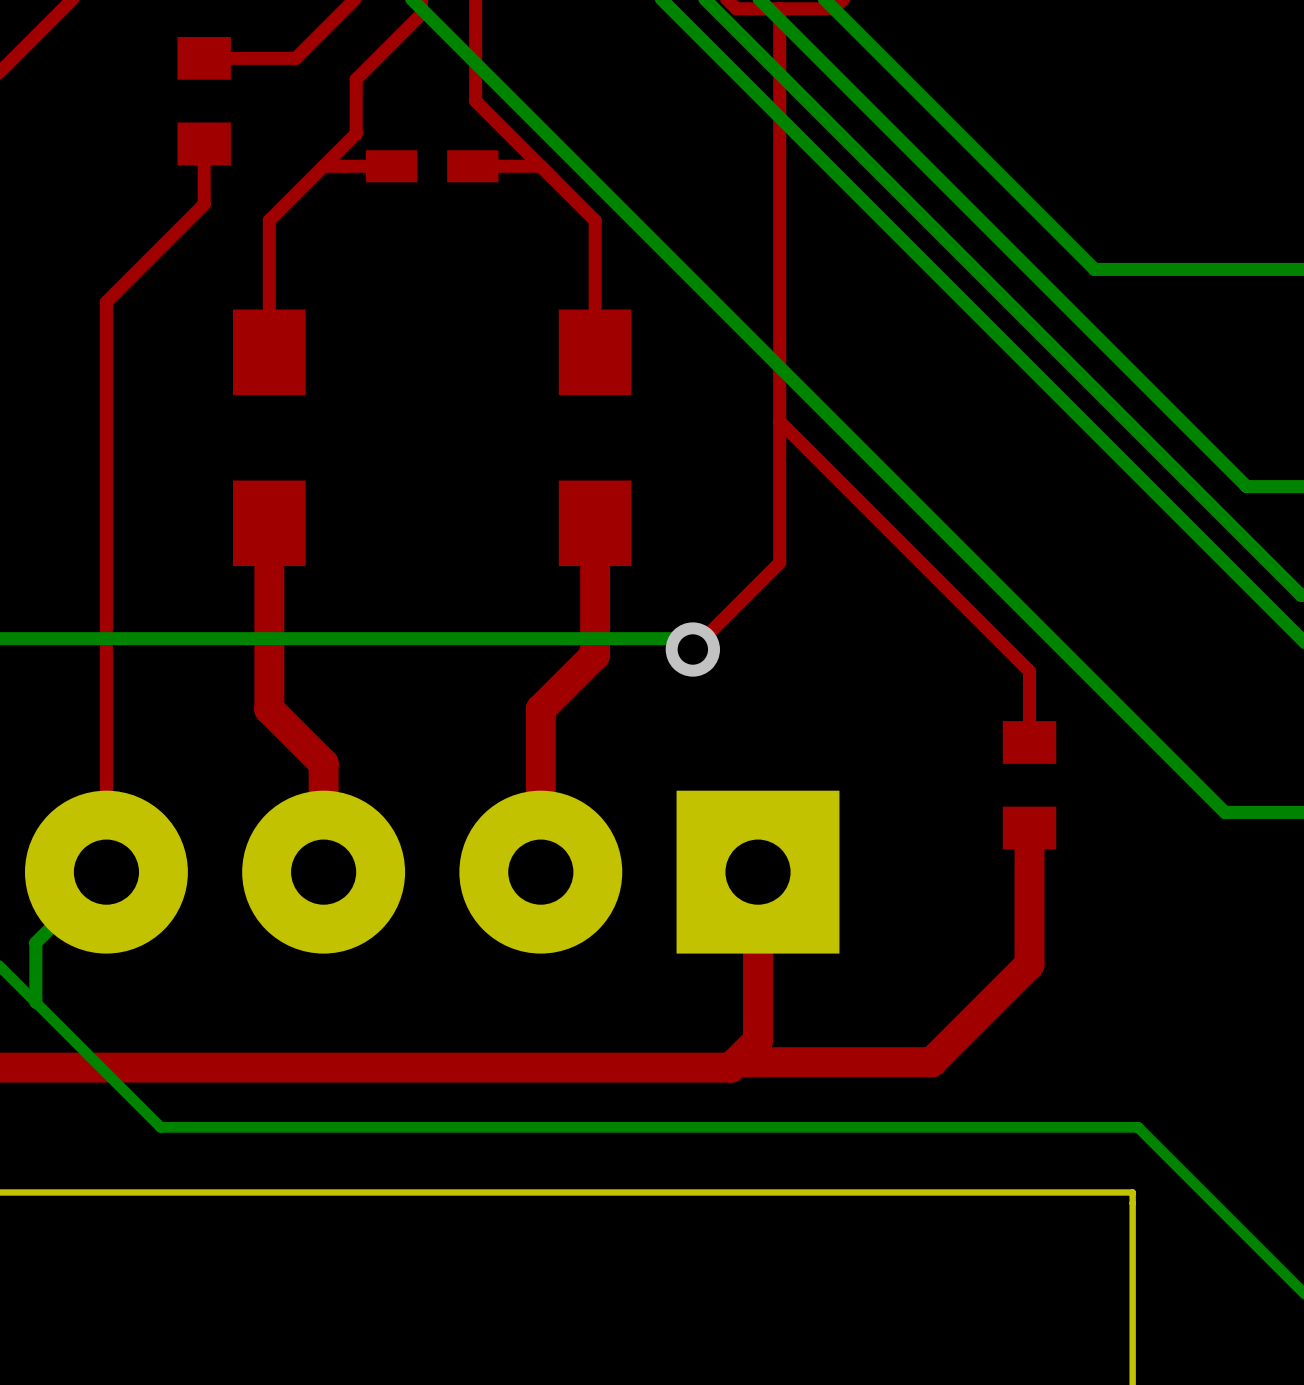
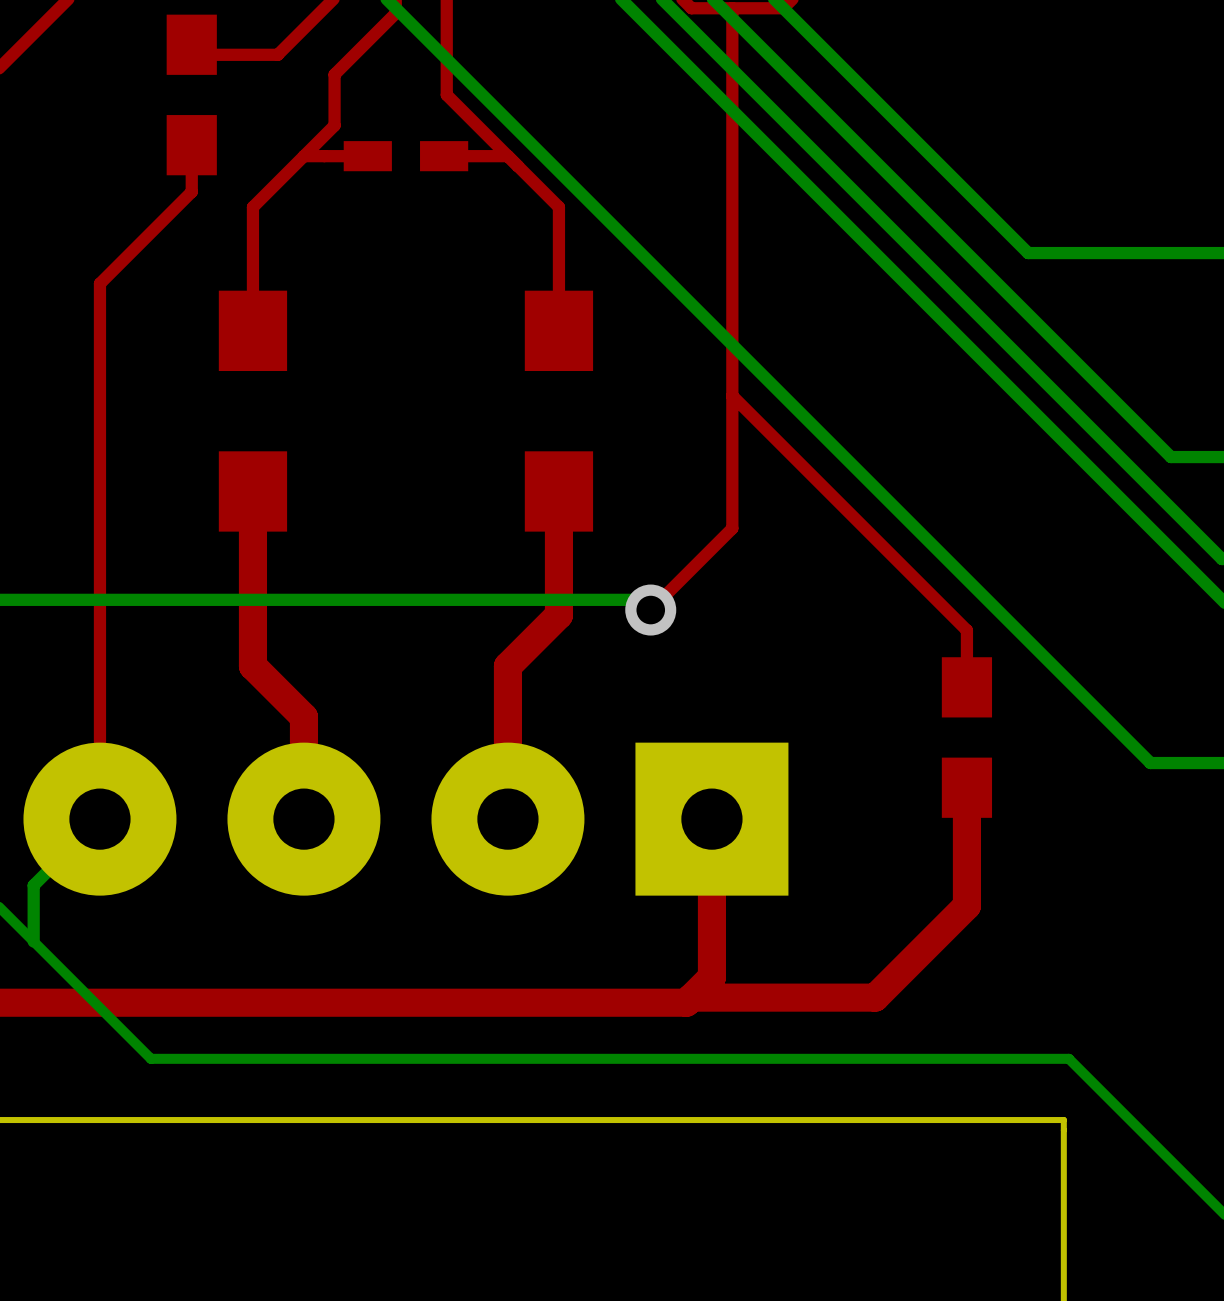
part footprint: [177, 36, 231, 166] -> [166, 14, 217, 176]
part footprint: [1002, 721, 1057, 850] -> [941, 657, 993, 818]

